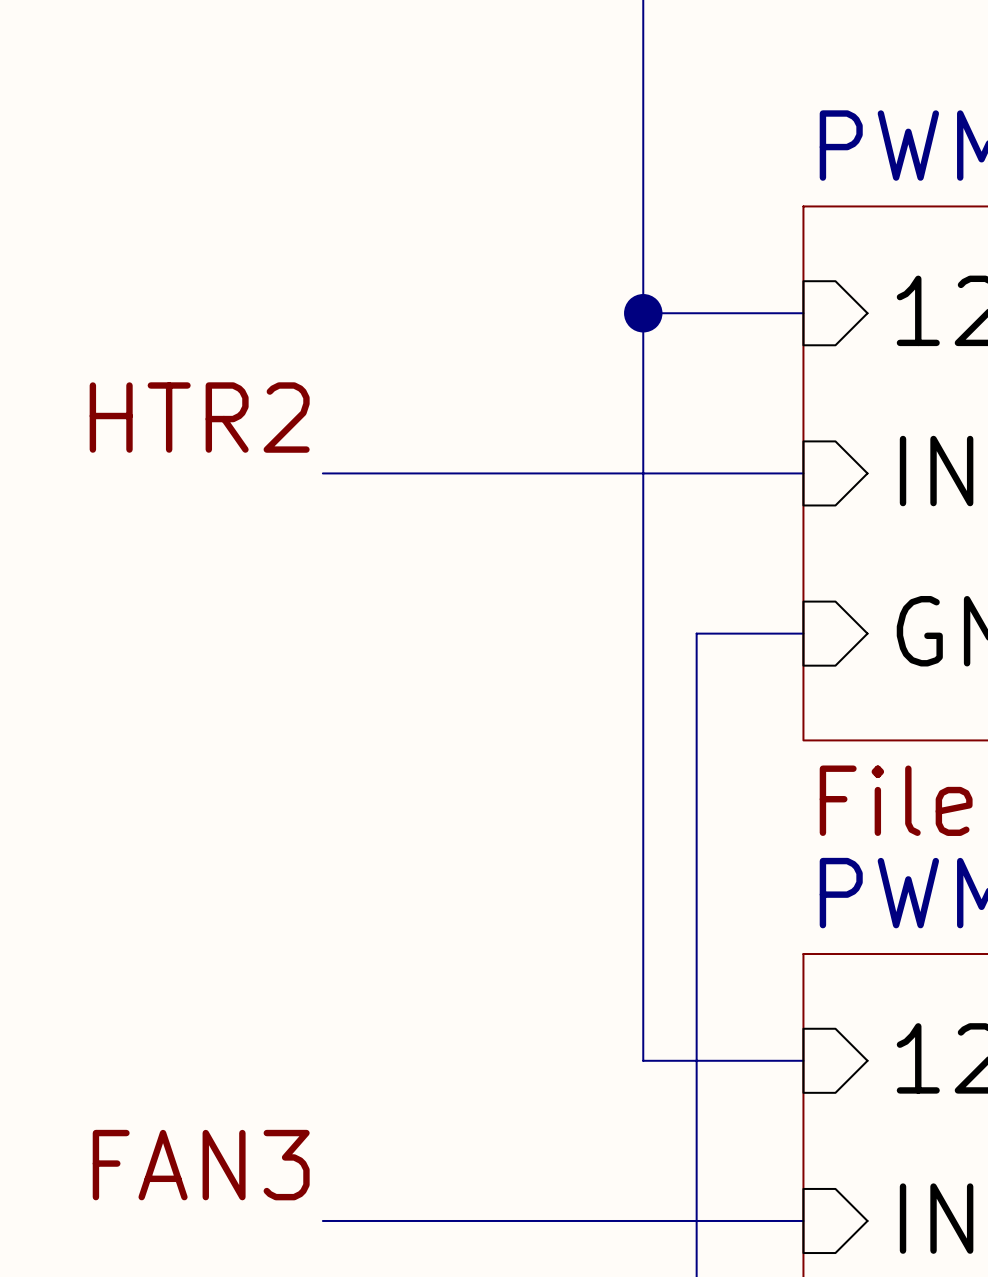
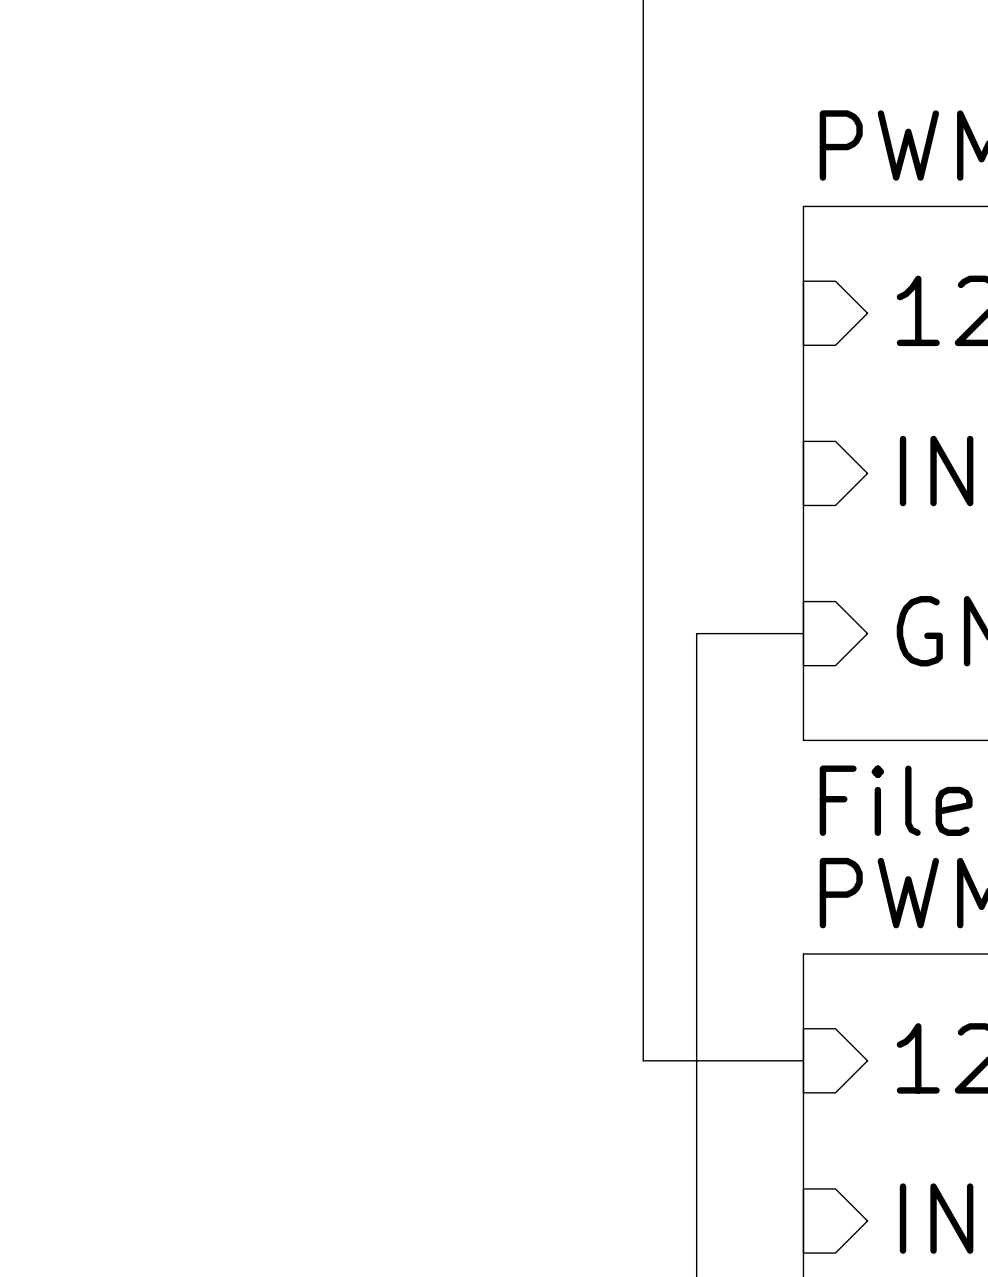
wire: (643, 313) (803, 313) -> none
junction: (643, 313) -> none
label: HTR2 (199, 417) -> none
wire: (322, 473) (803, 473) -> none
label: FAN3 (201, 1165) -> none
wire: (322, 1220) (803, 1220) -> none

